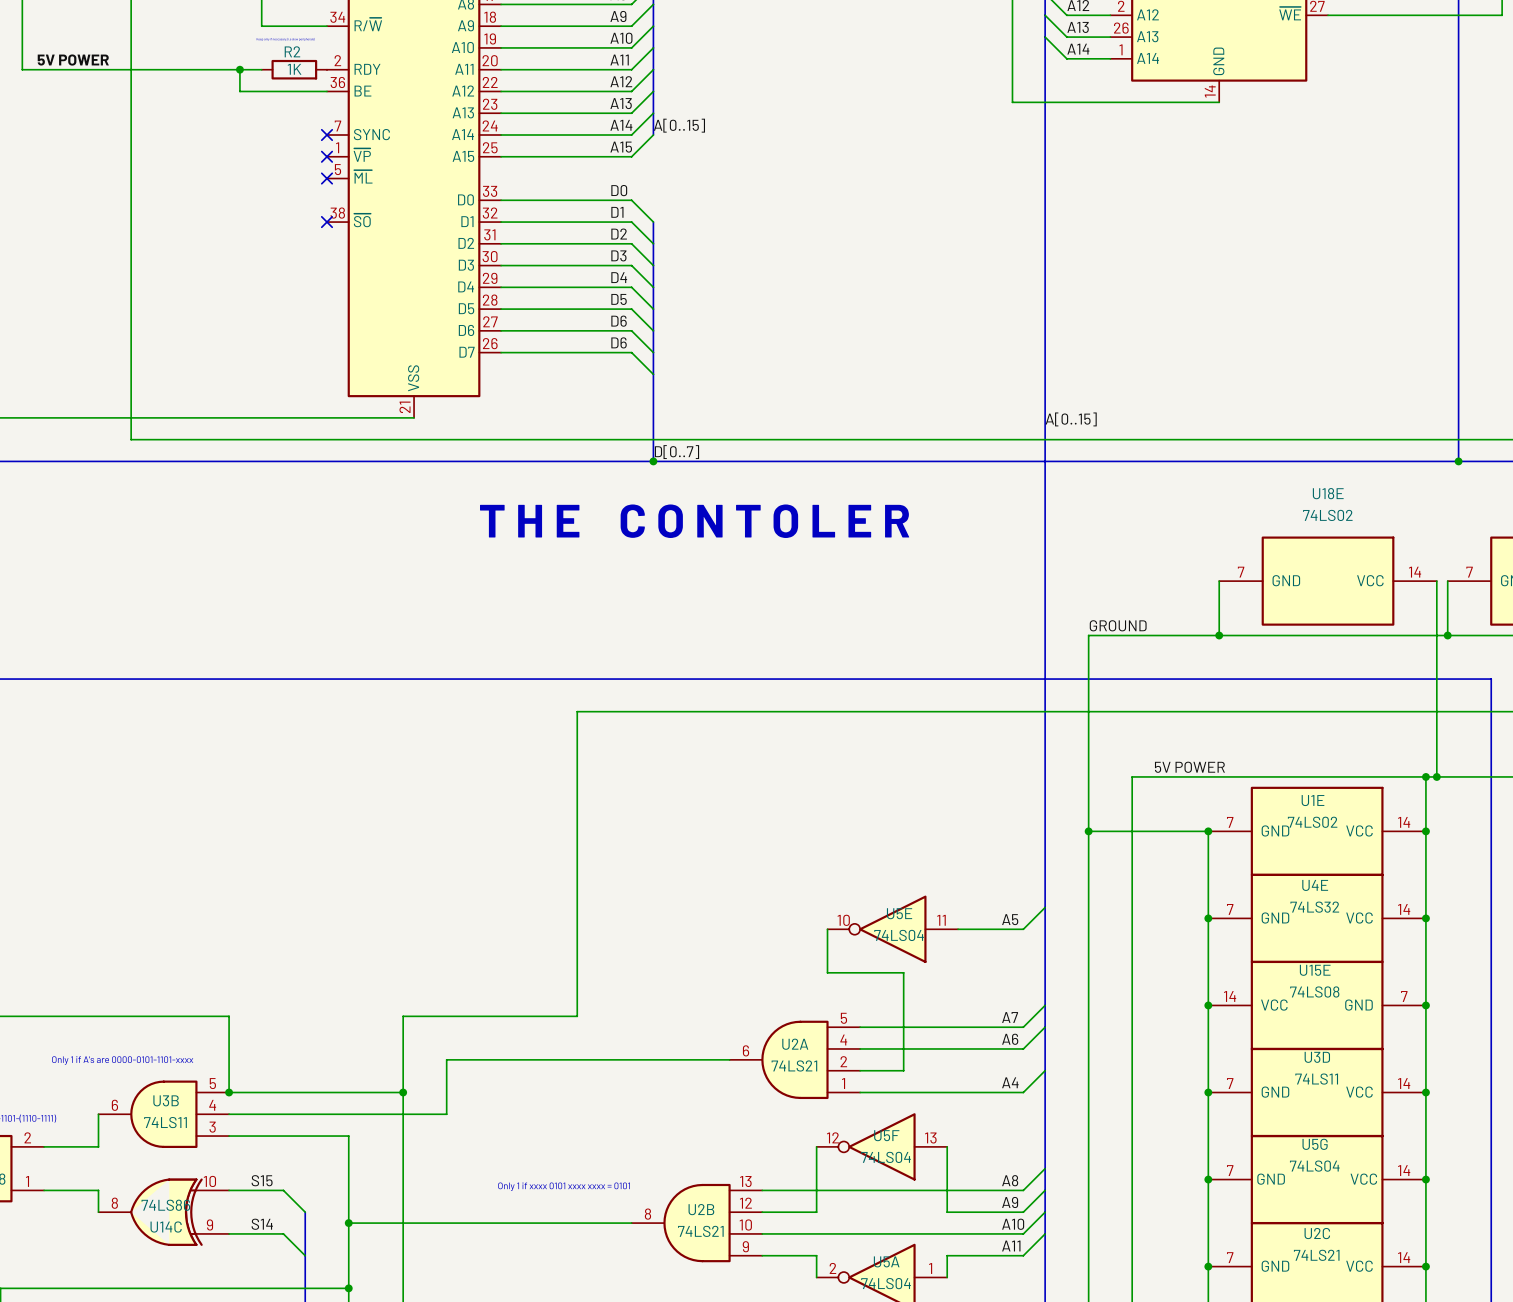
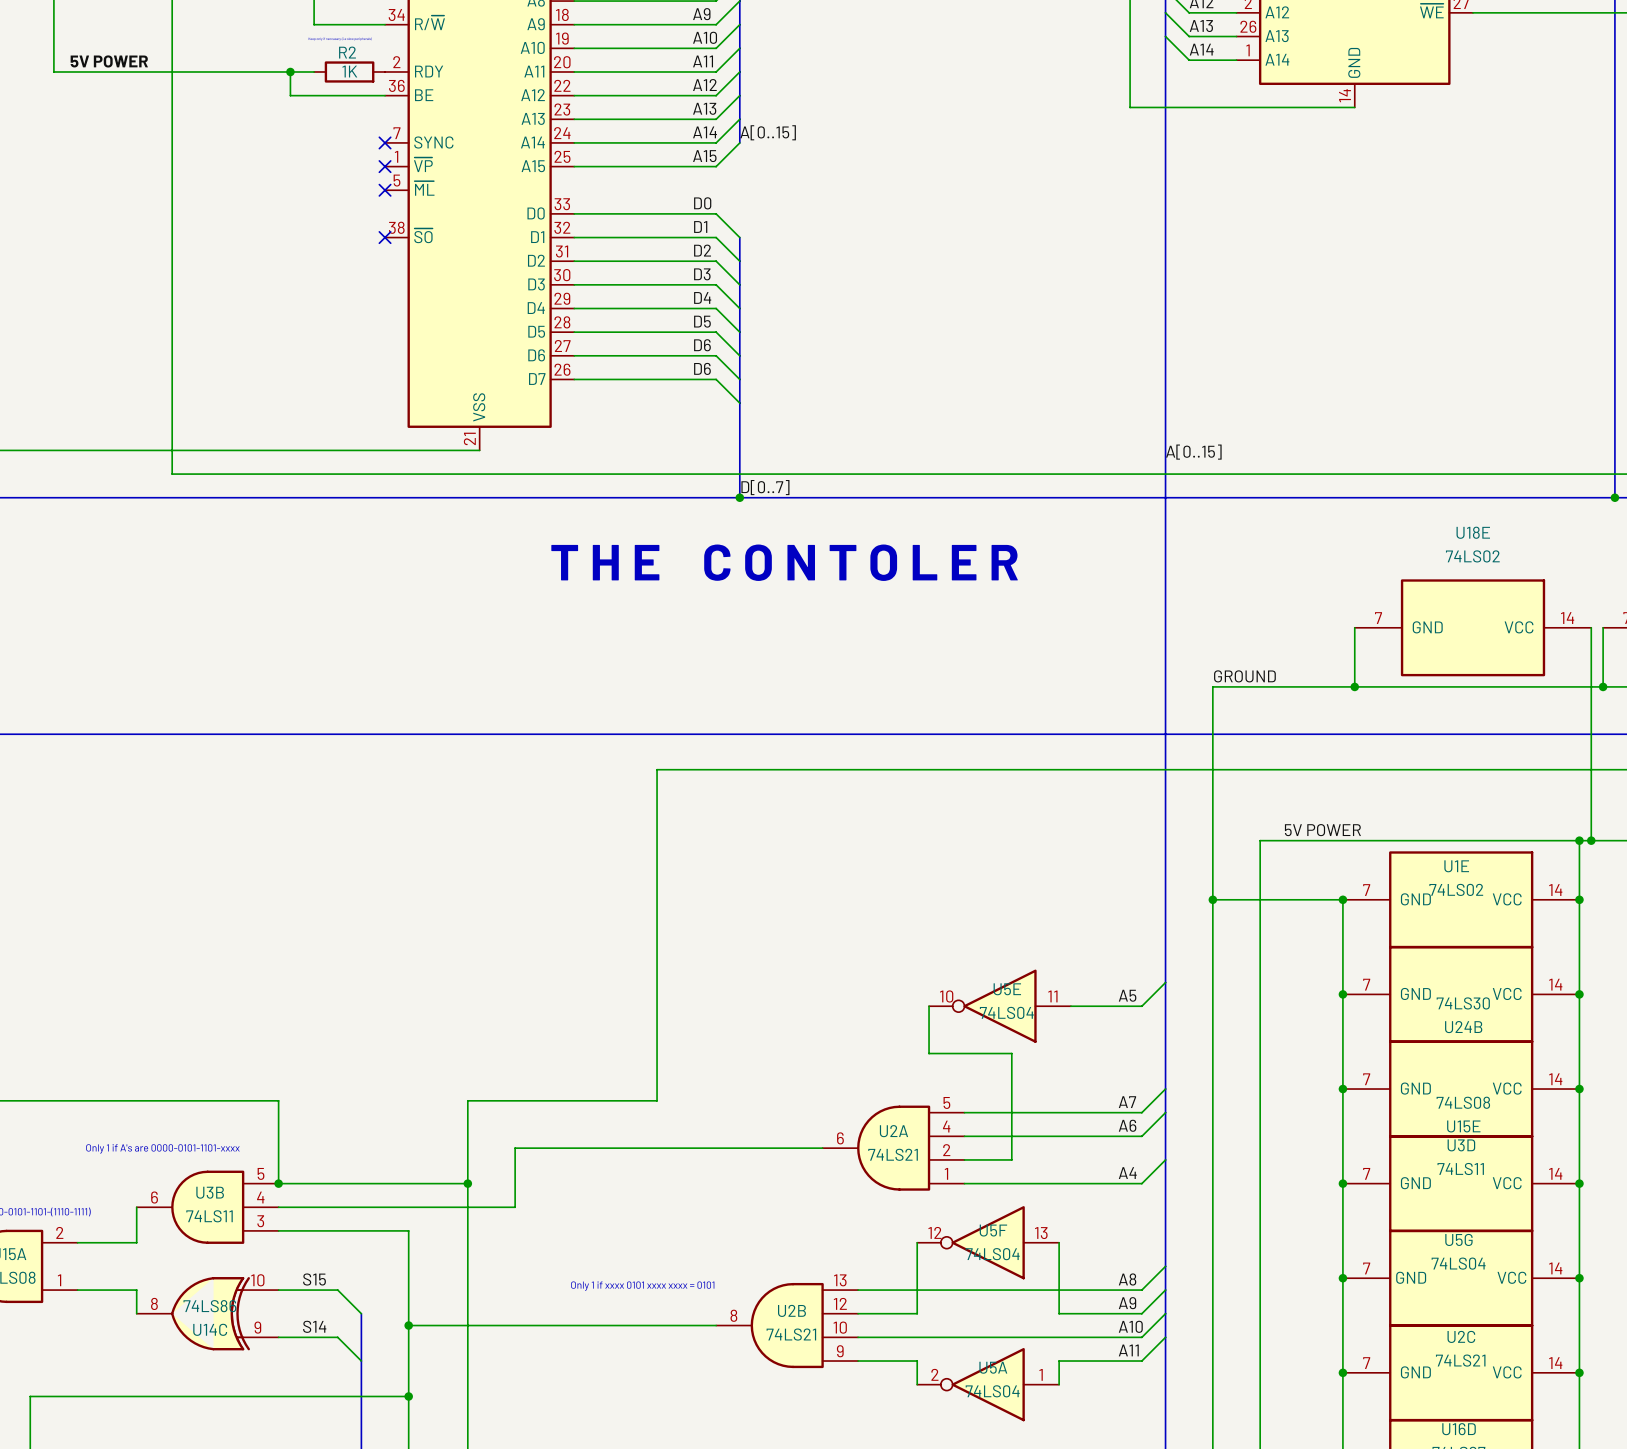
U4E name: U4E (1315, 885) -> U24B (1463, 1027)
U4E value: 74LS32 (1314, 907) -> 74LS30 (1463, 1003)
U15E rotation: 0° (1317, 1005) -> 180° (1461, 1089)

